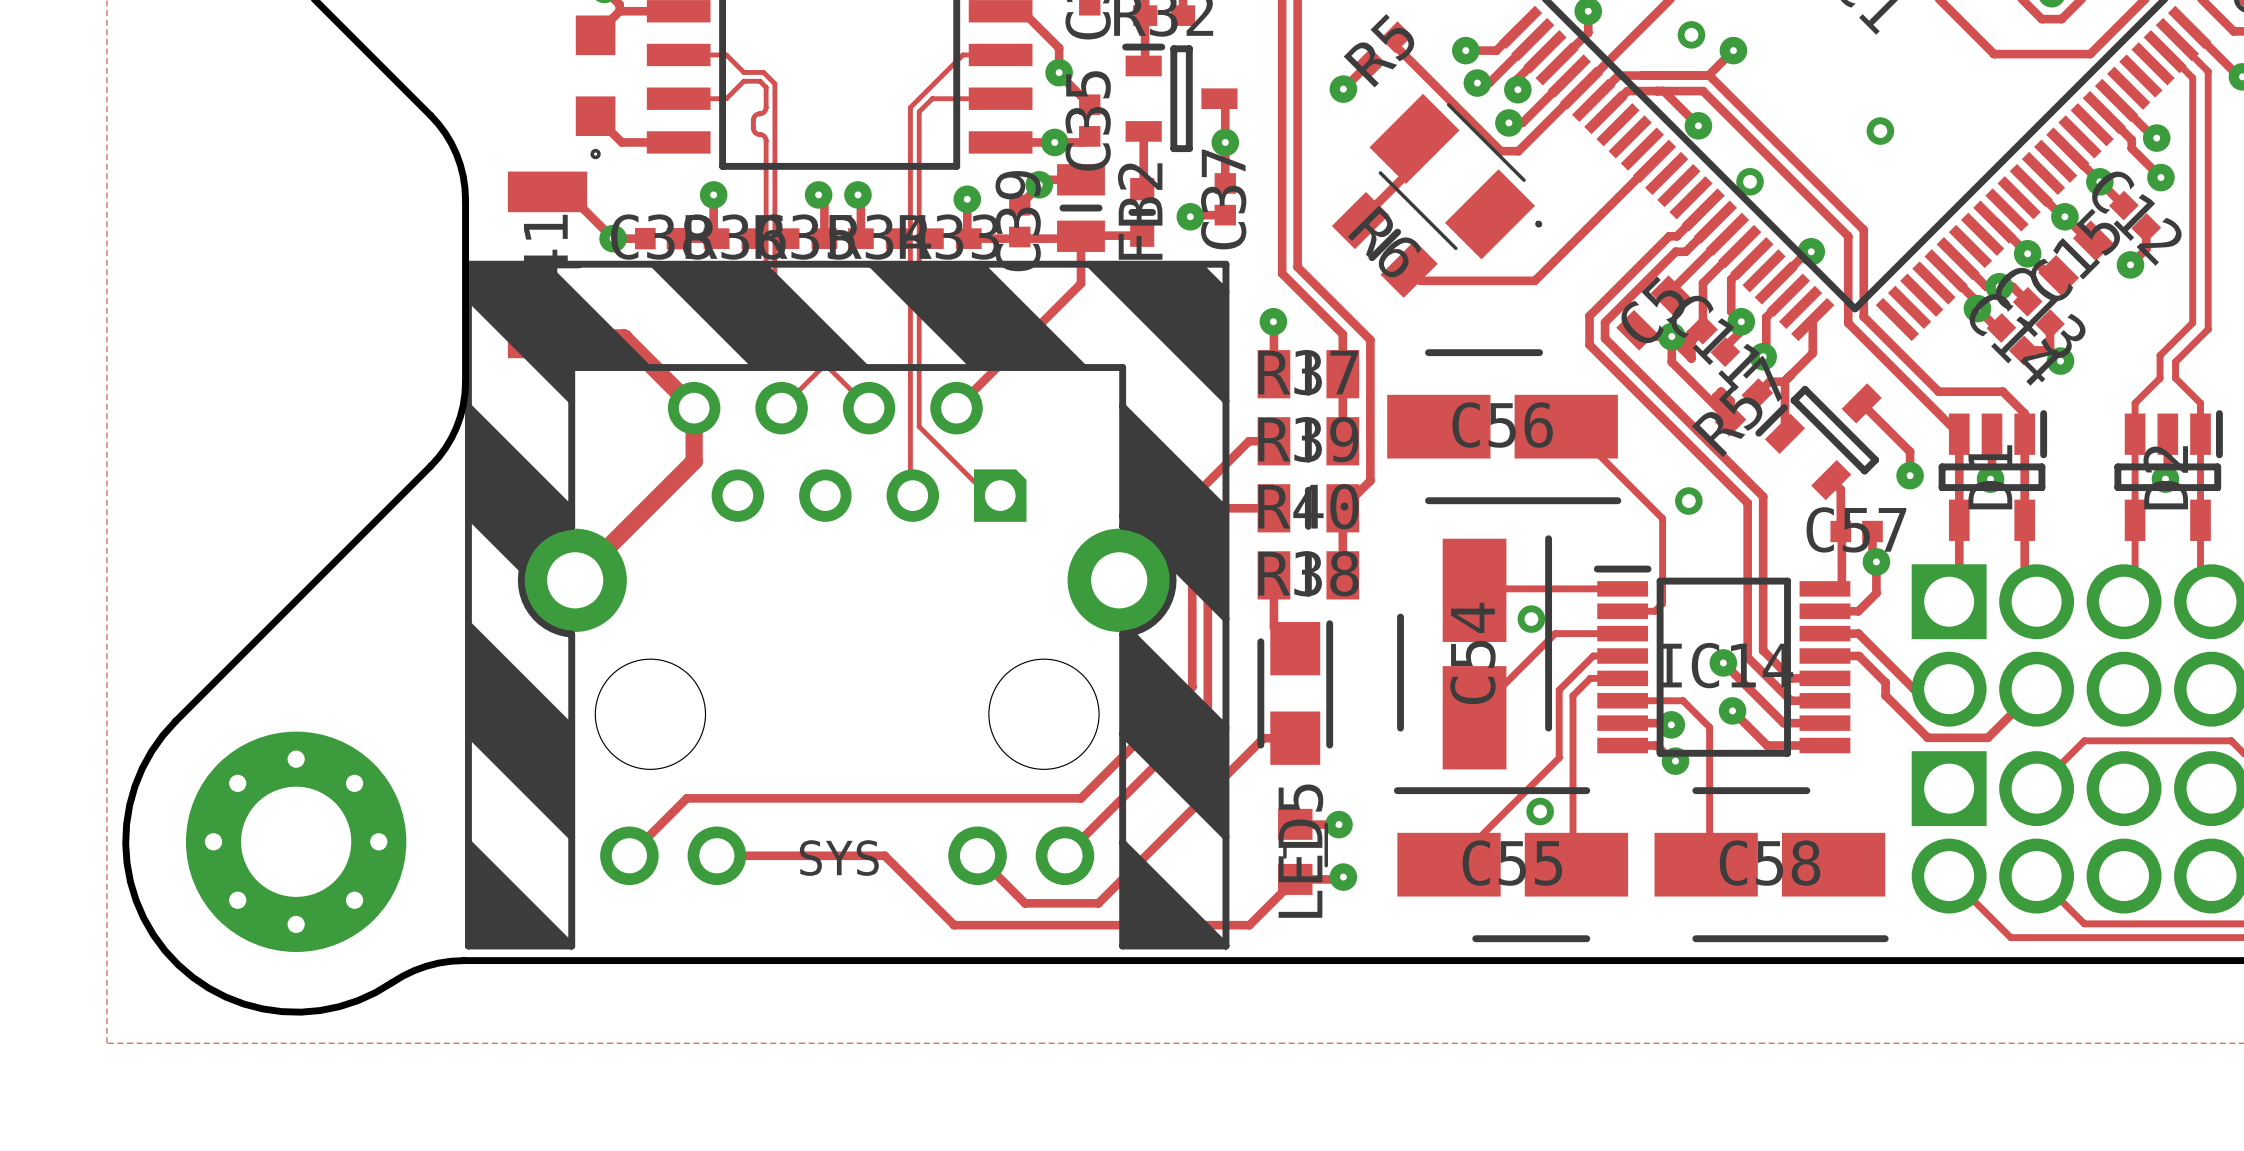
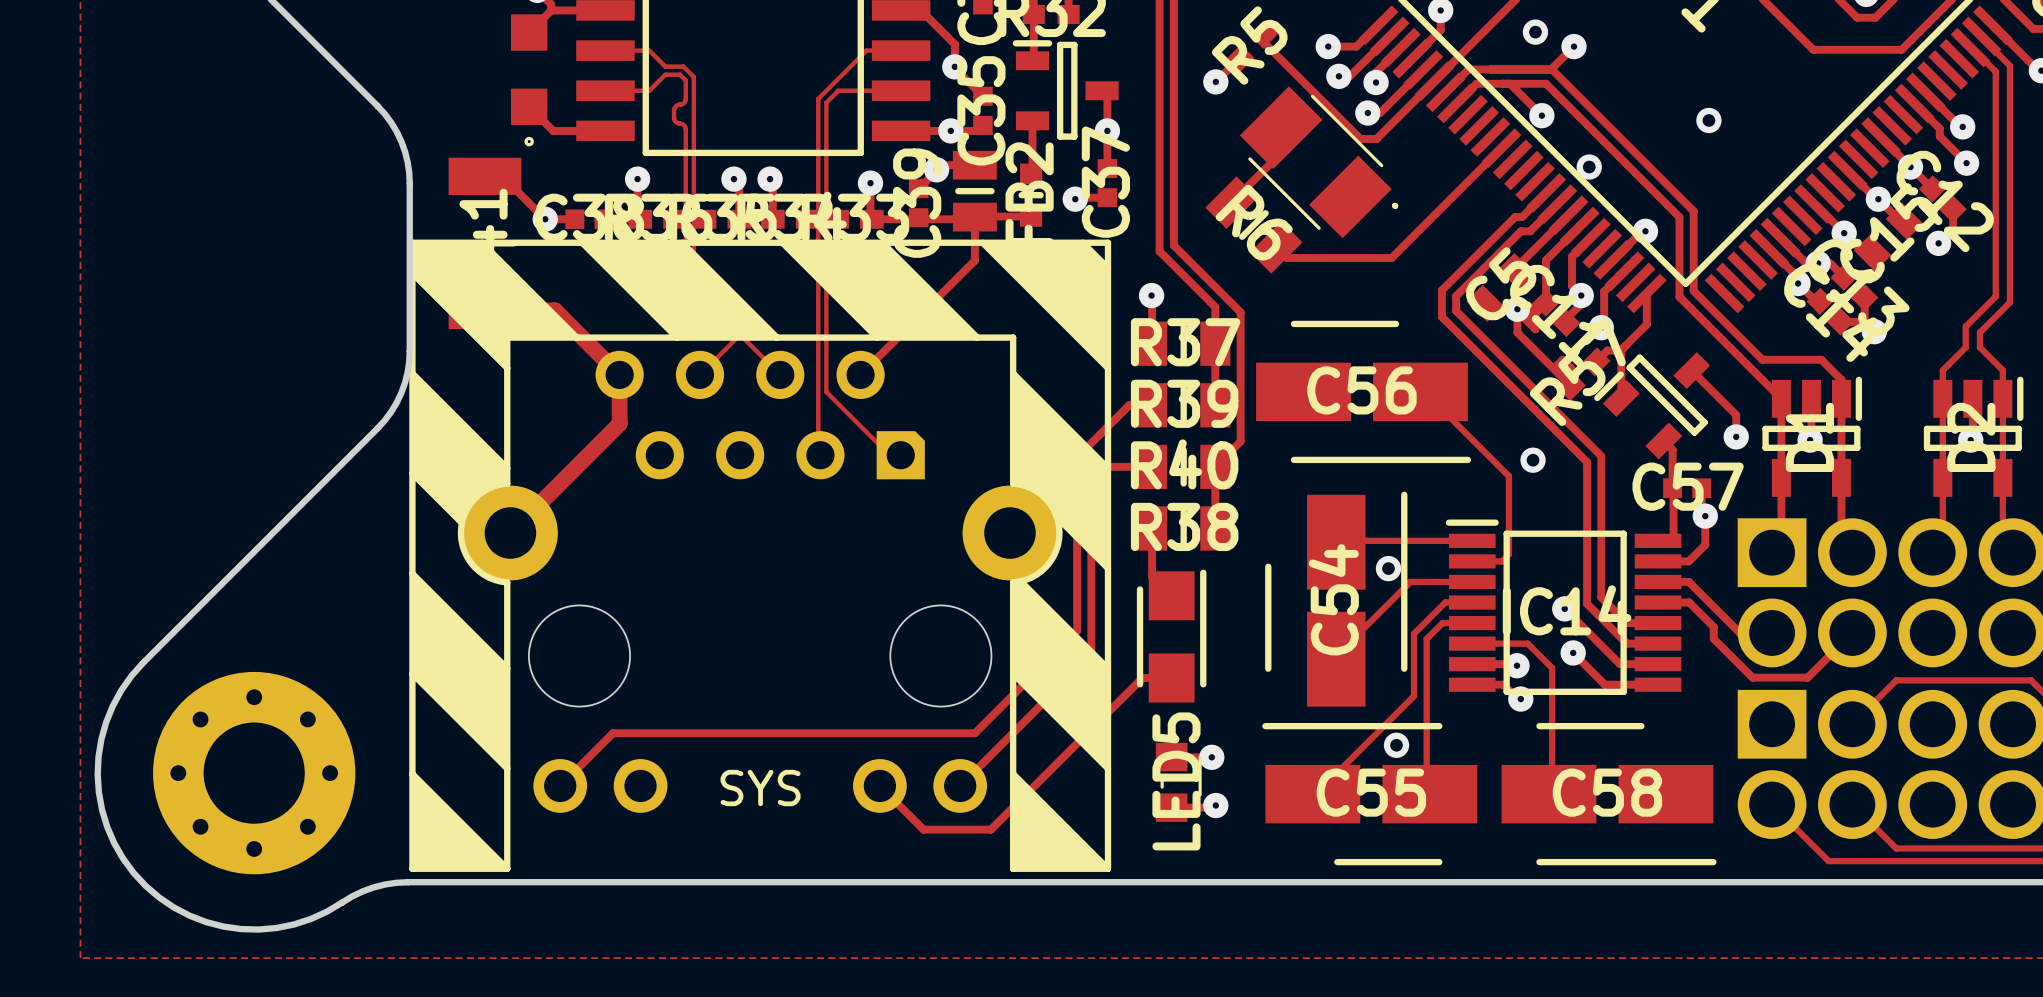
track: (716, 855) (884, 855) (954, 925) (1249, 925) (1295, 879) -> none

